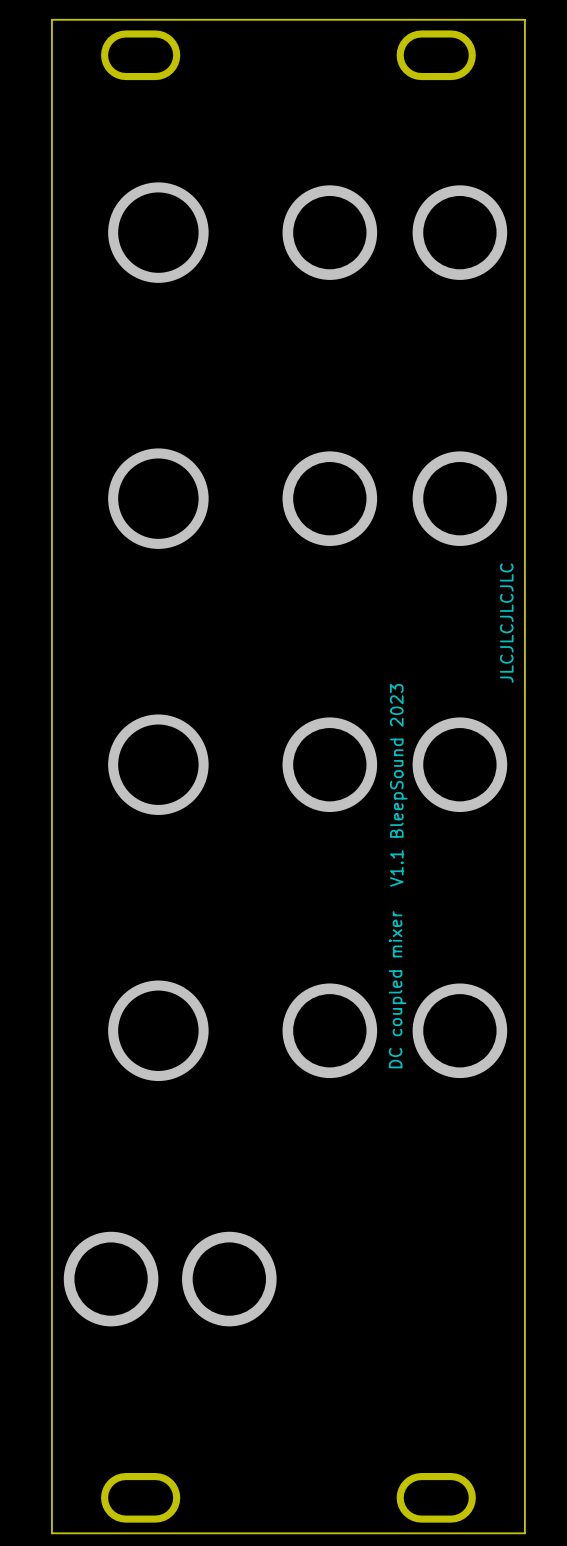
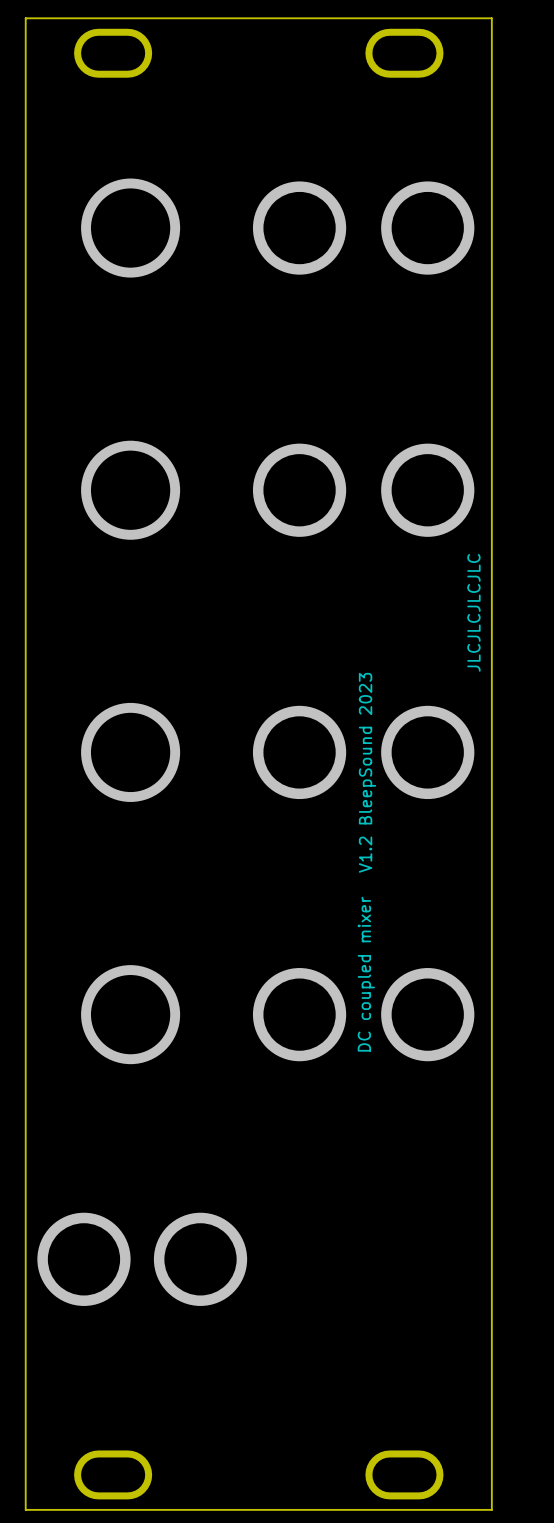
text: V1.1 BleepSound 2023 (398, 785) -> V1.2 BleepSound 2023 (367, 772)

